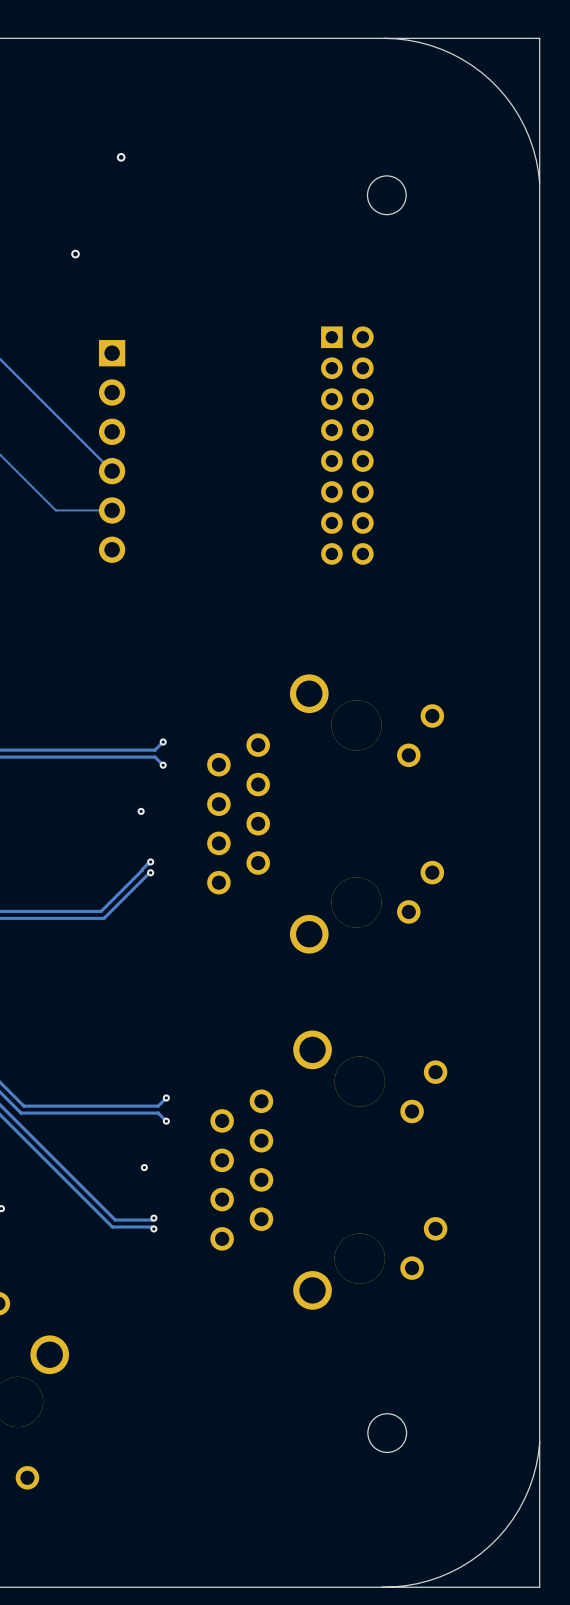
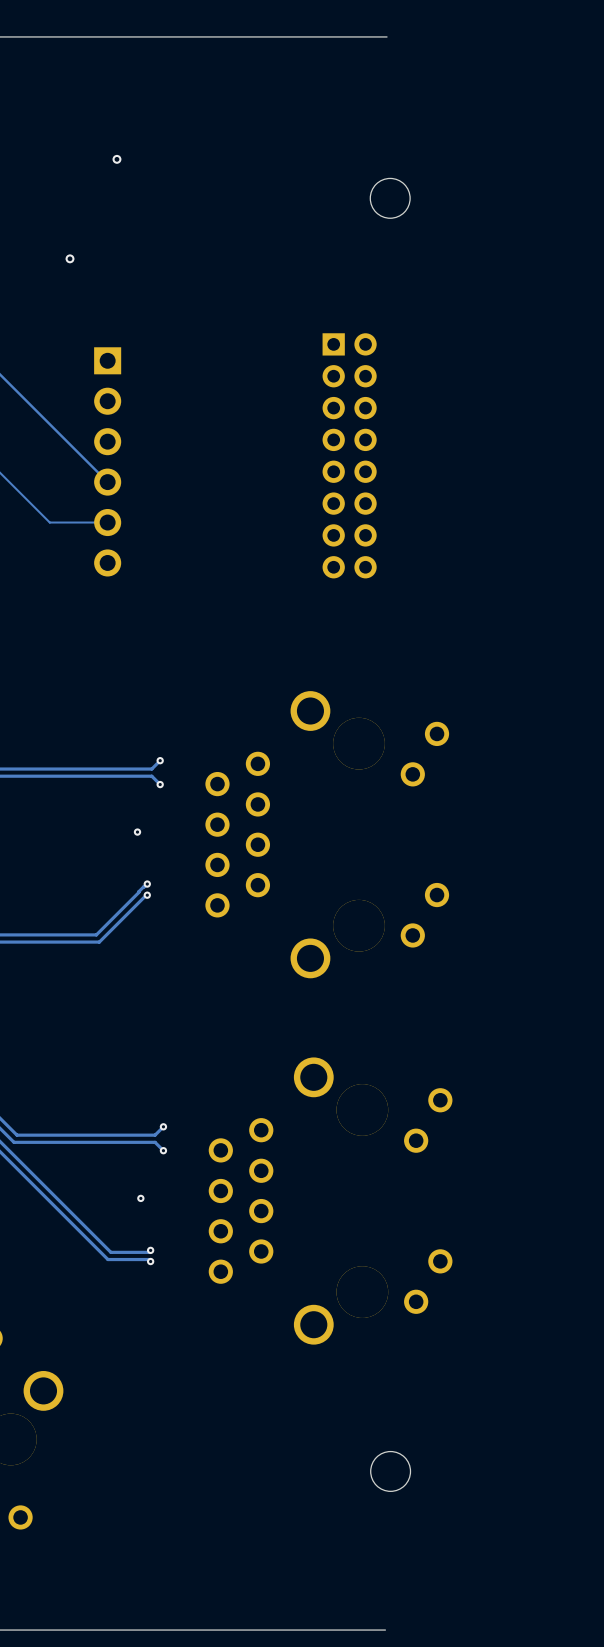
board edge: (539, 183) (533, 148) (524, 126) (513, 106) (490, 79) (471, 65) (440, 49) (407, 40) (383, 38) (539, 38) (539, 1587) (382, 1587) (405, 1585) (439, 1576) (461, 1566) (489, 1545) (505, 1528) (524, 1498) (533, 1476) (536, 1465) (538, 1453) (539, 1442) -> none

